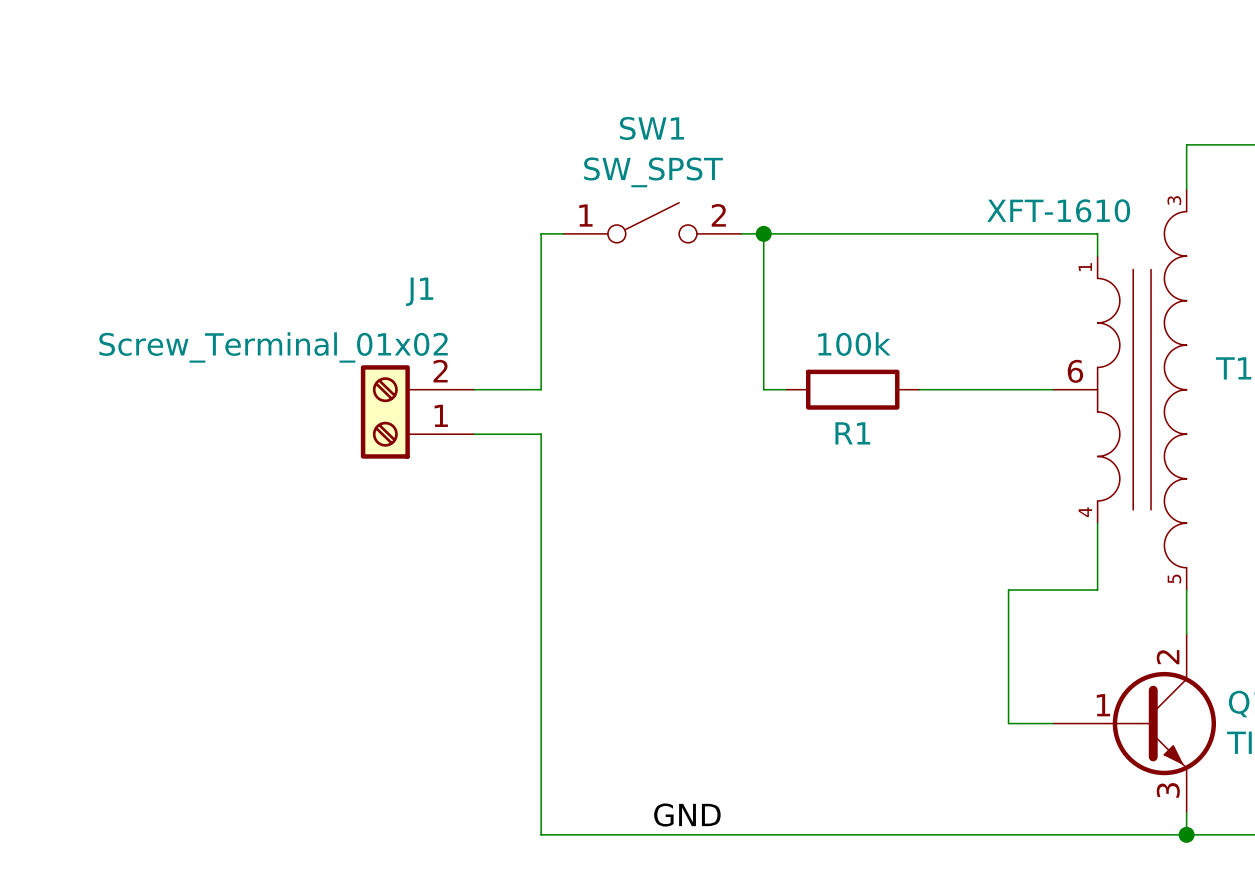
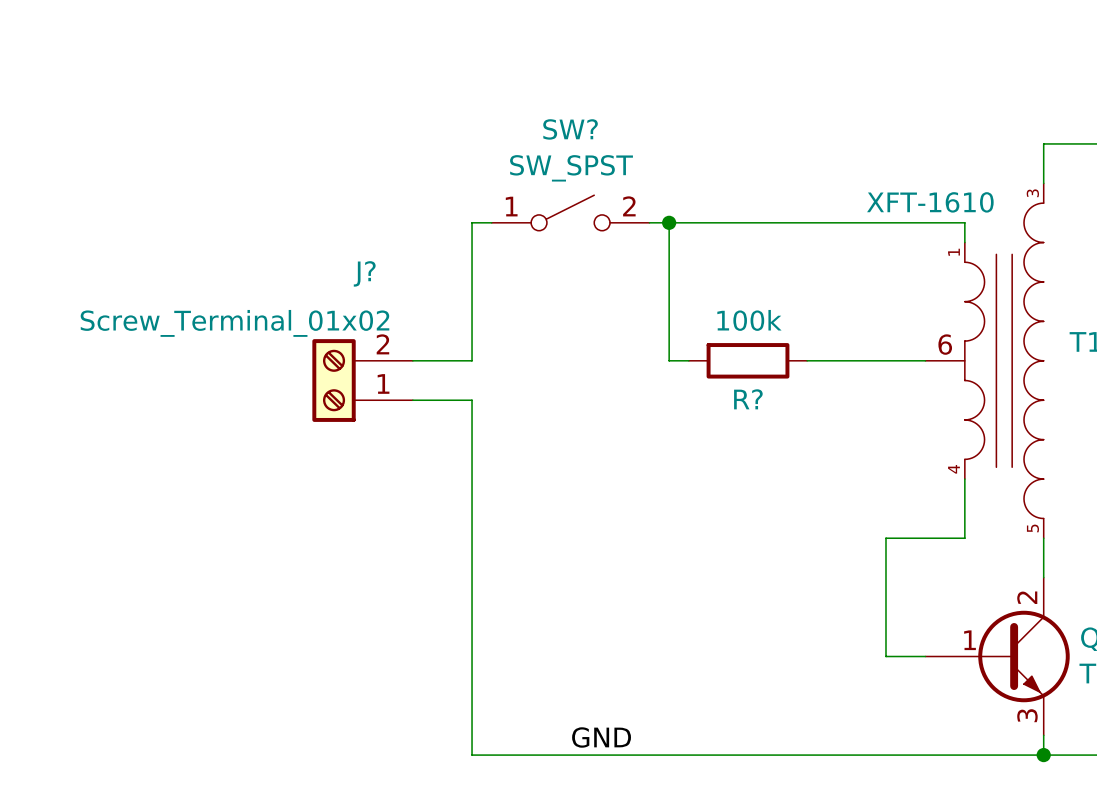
SW1 name: SW1 (652, 128) -> SW? (570, 129)
J1 name: J1 (419, 291) -> J? (364, 273)
R1 name: R1 (852, 433) -> R? (748, 399)

